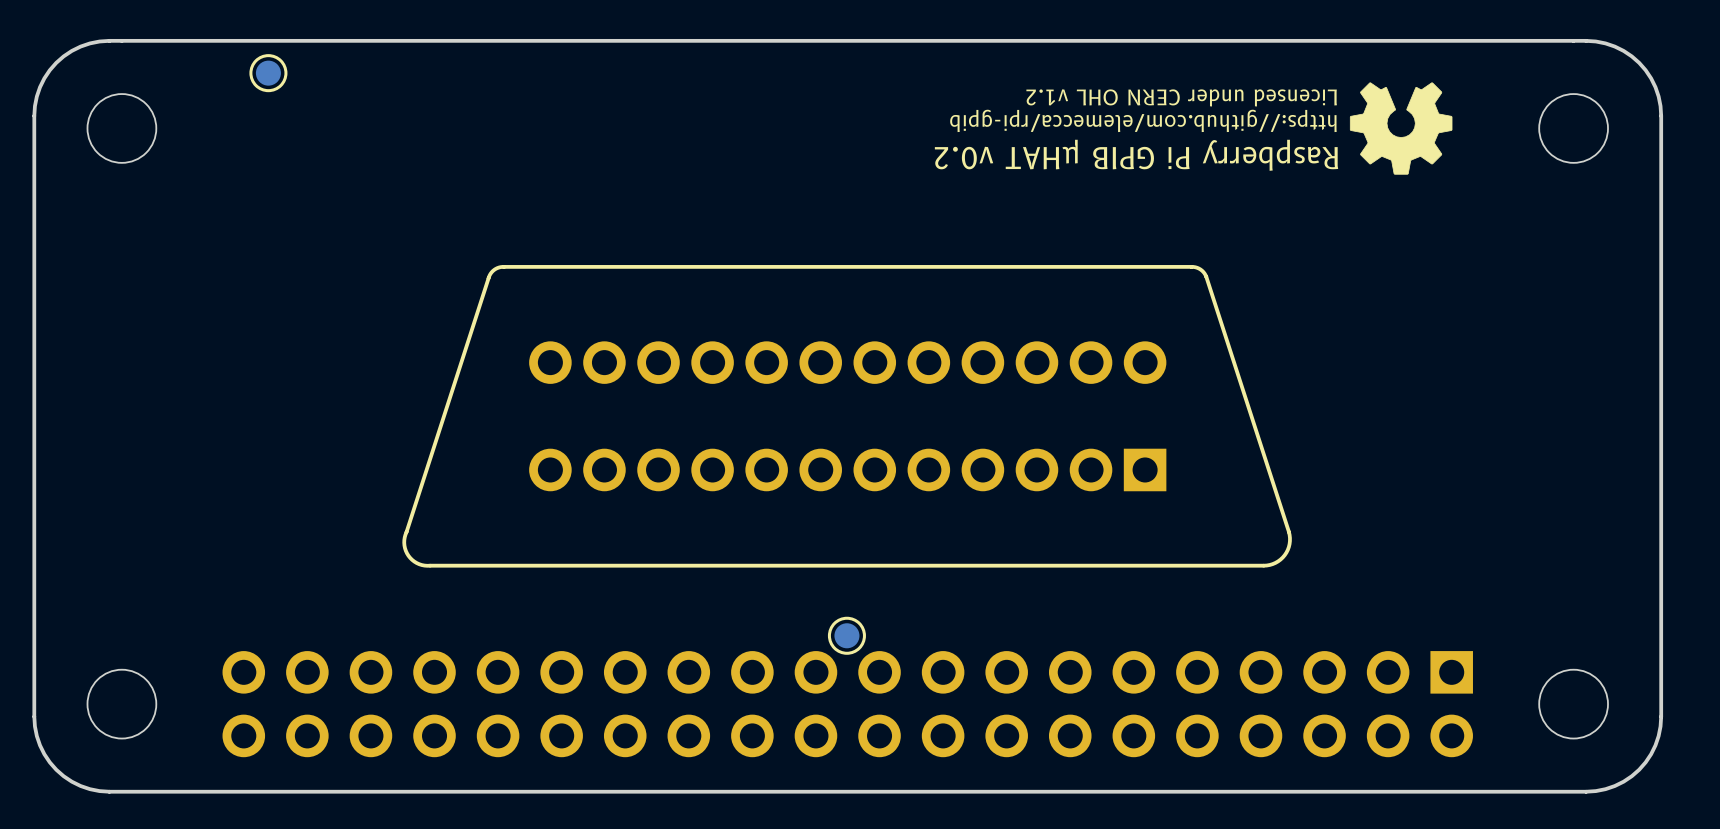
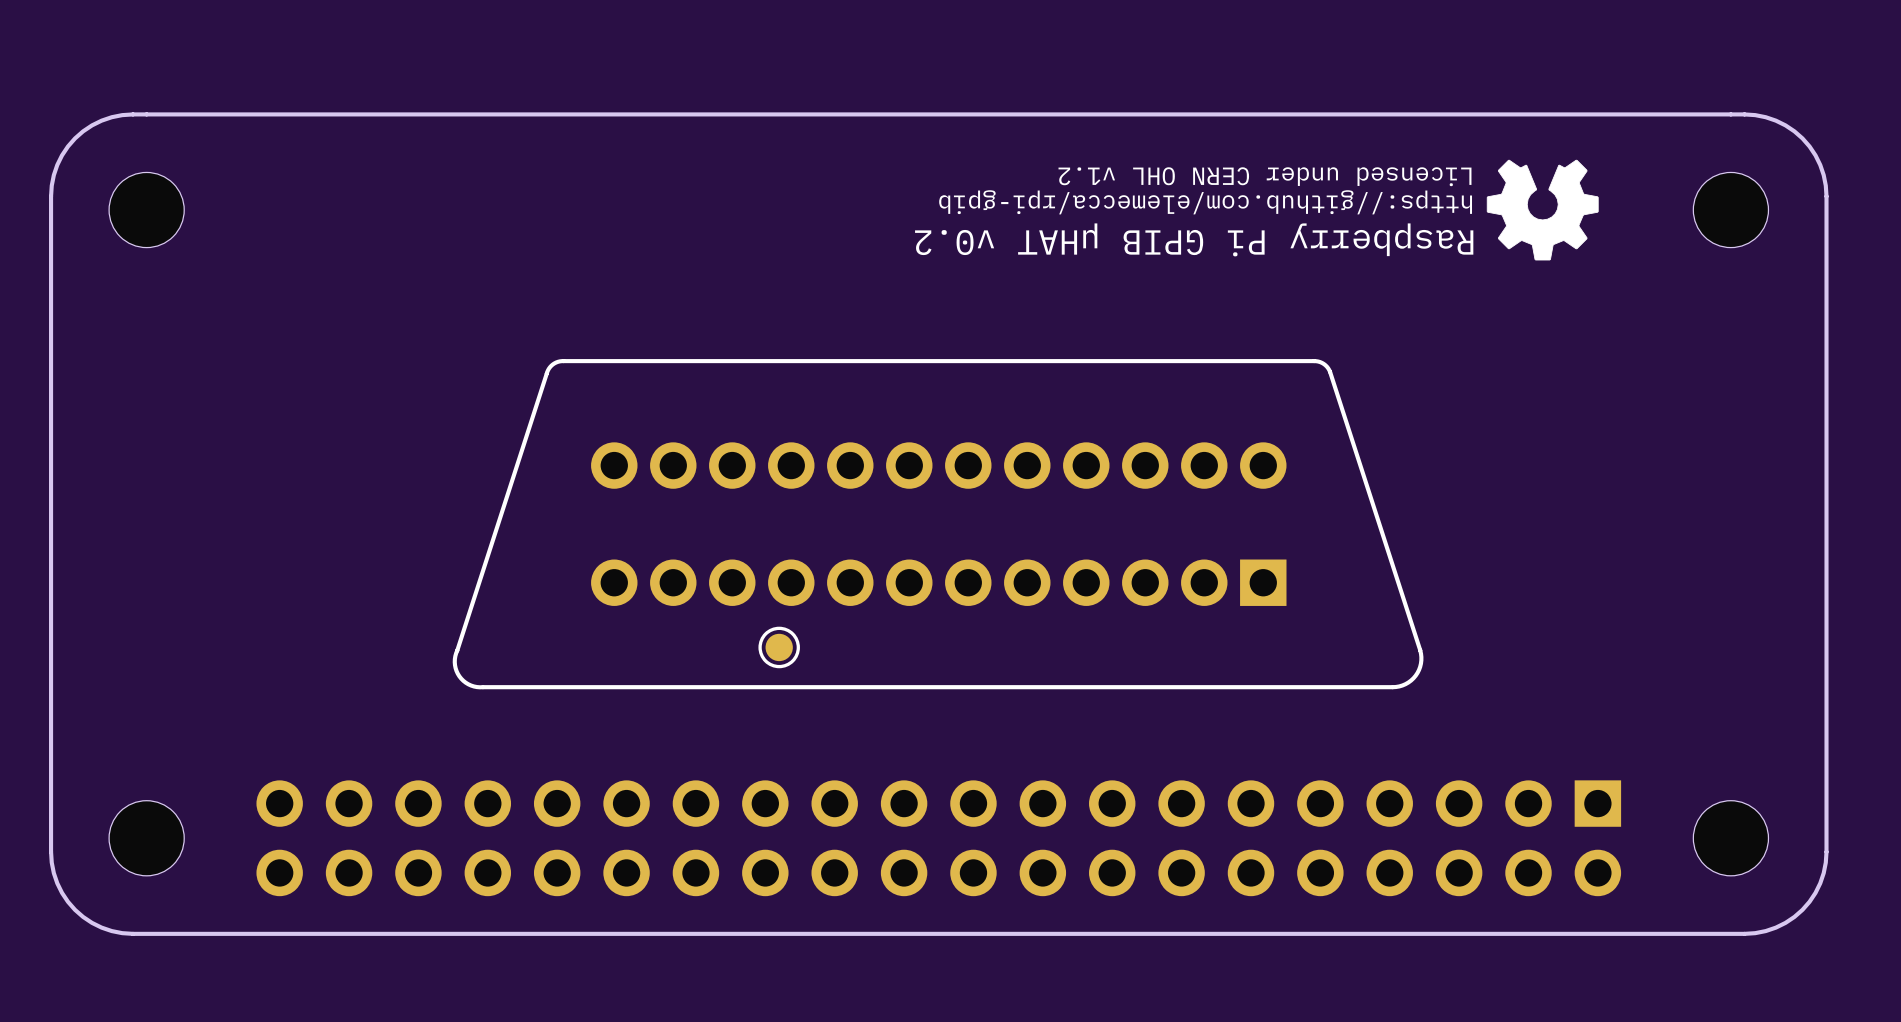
part: (268, 73) -> none
part position: (846, 635) -> (779, 647)

